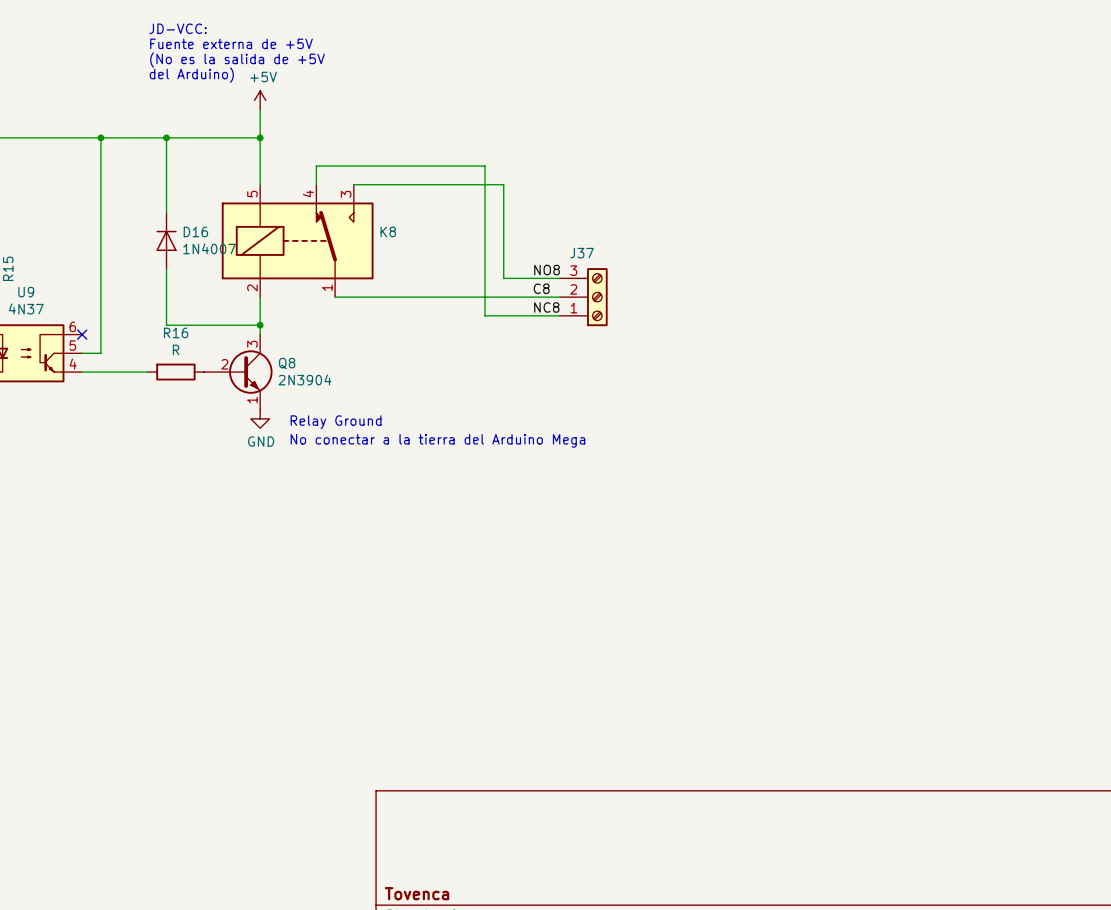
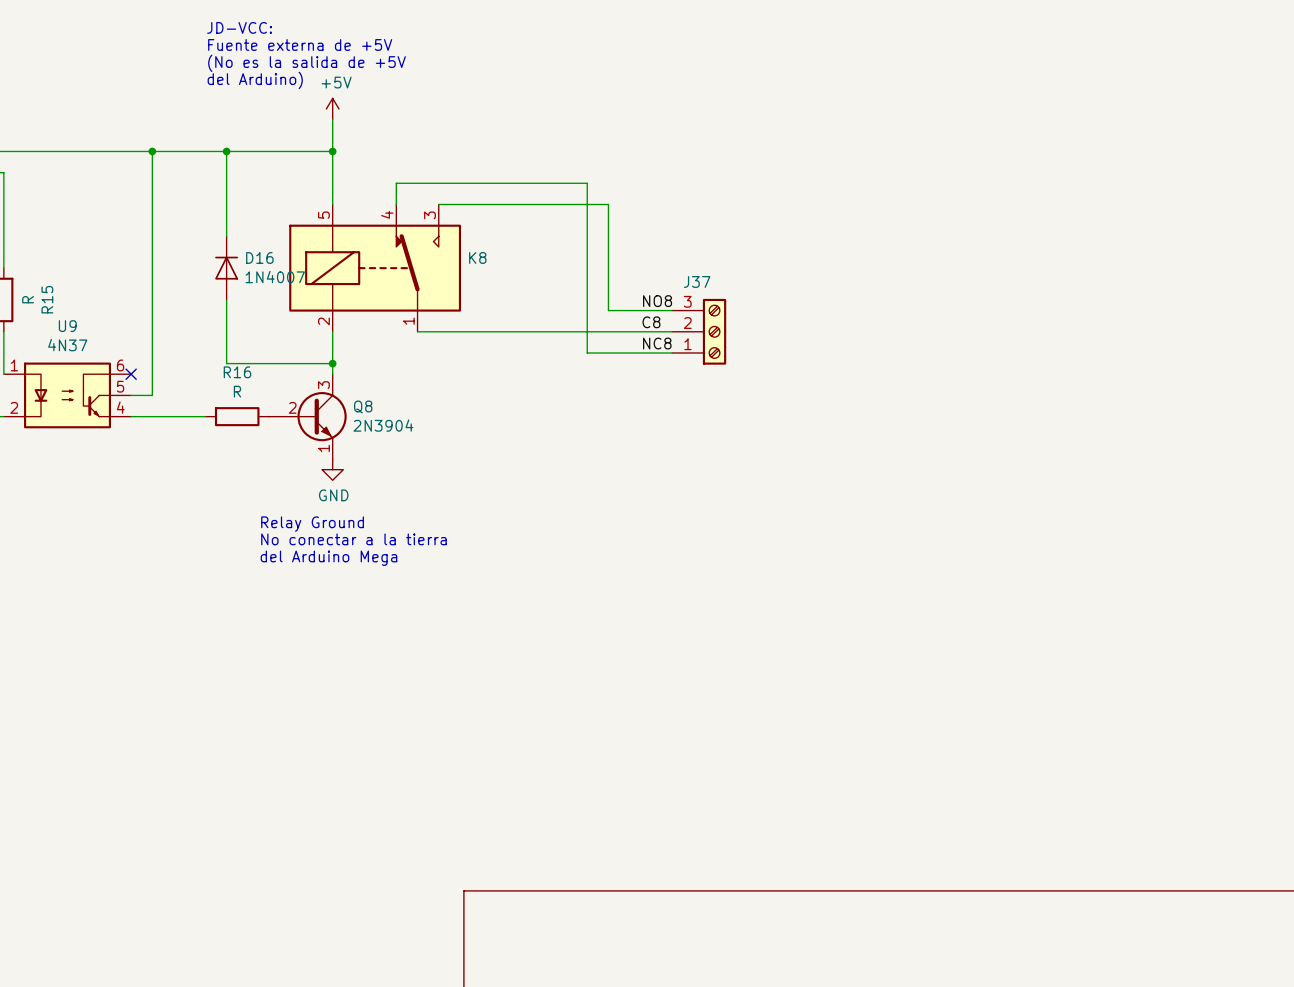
text position: Relay Ground (336, 422) -> Relay Ground (312, 524)
text: No conectar a la tierra del Arduino Mega (437, 440) -> none
text: none -> No conectar a la tierra (353, 539)
text: none -> del Arduino Mega (328, 558)

